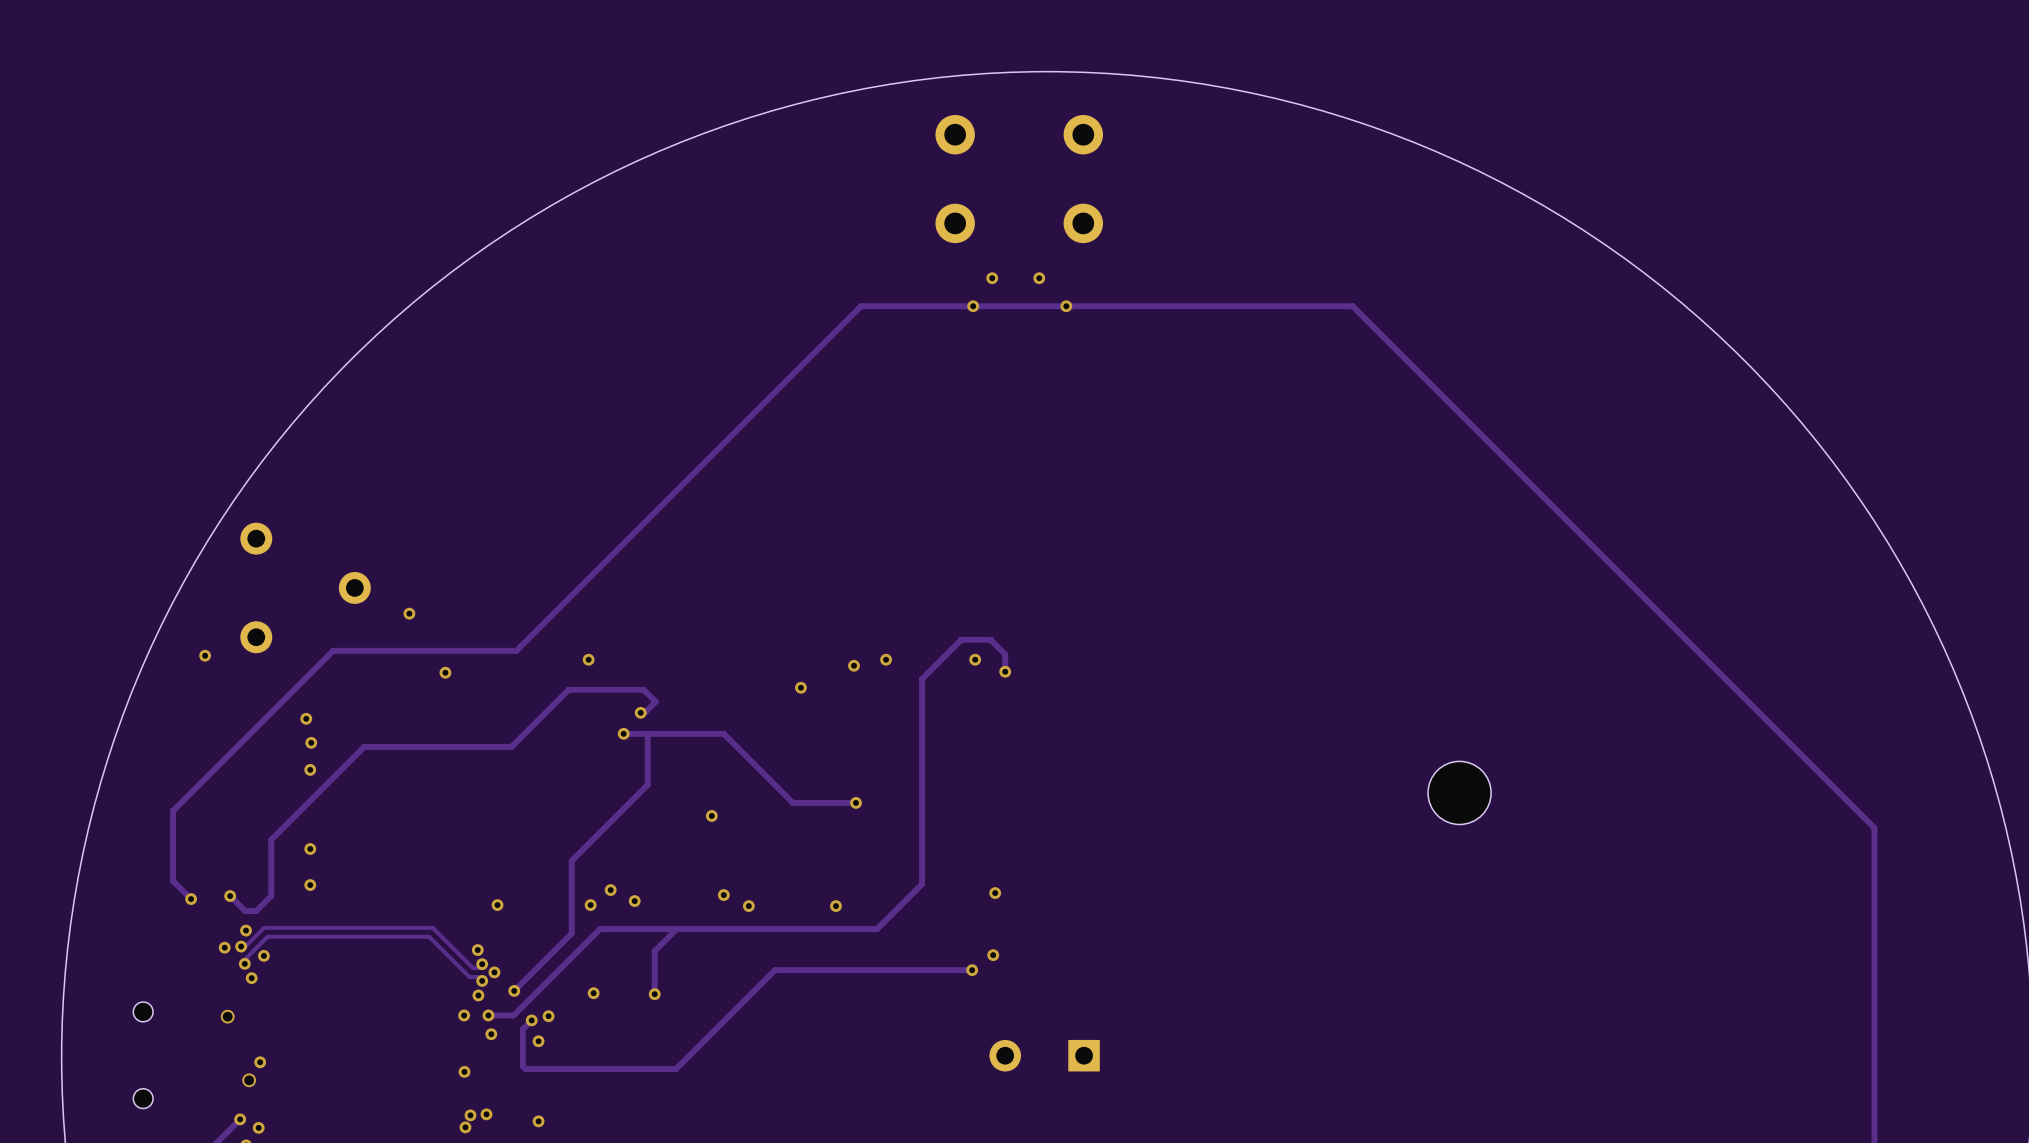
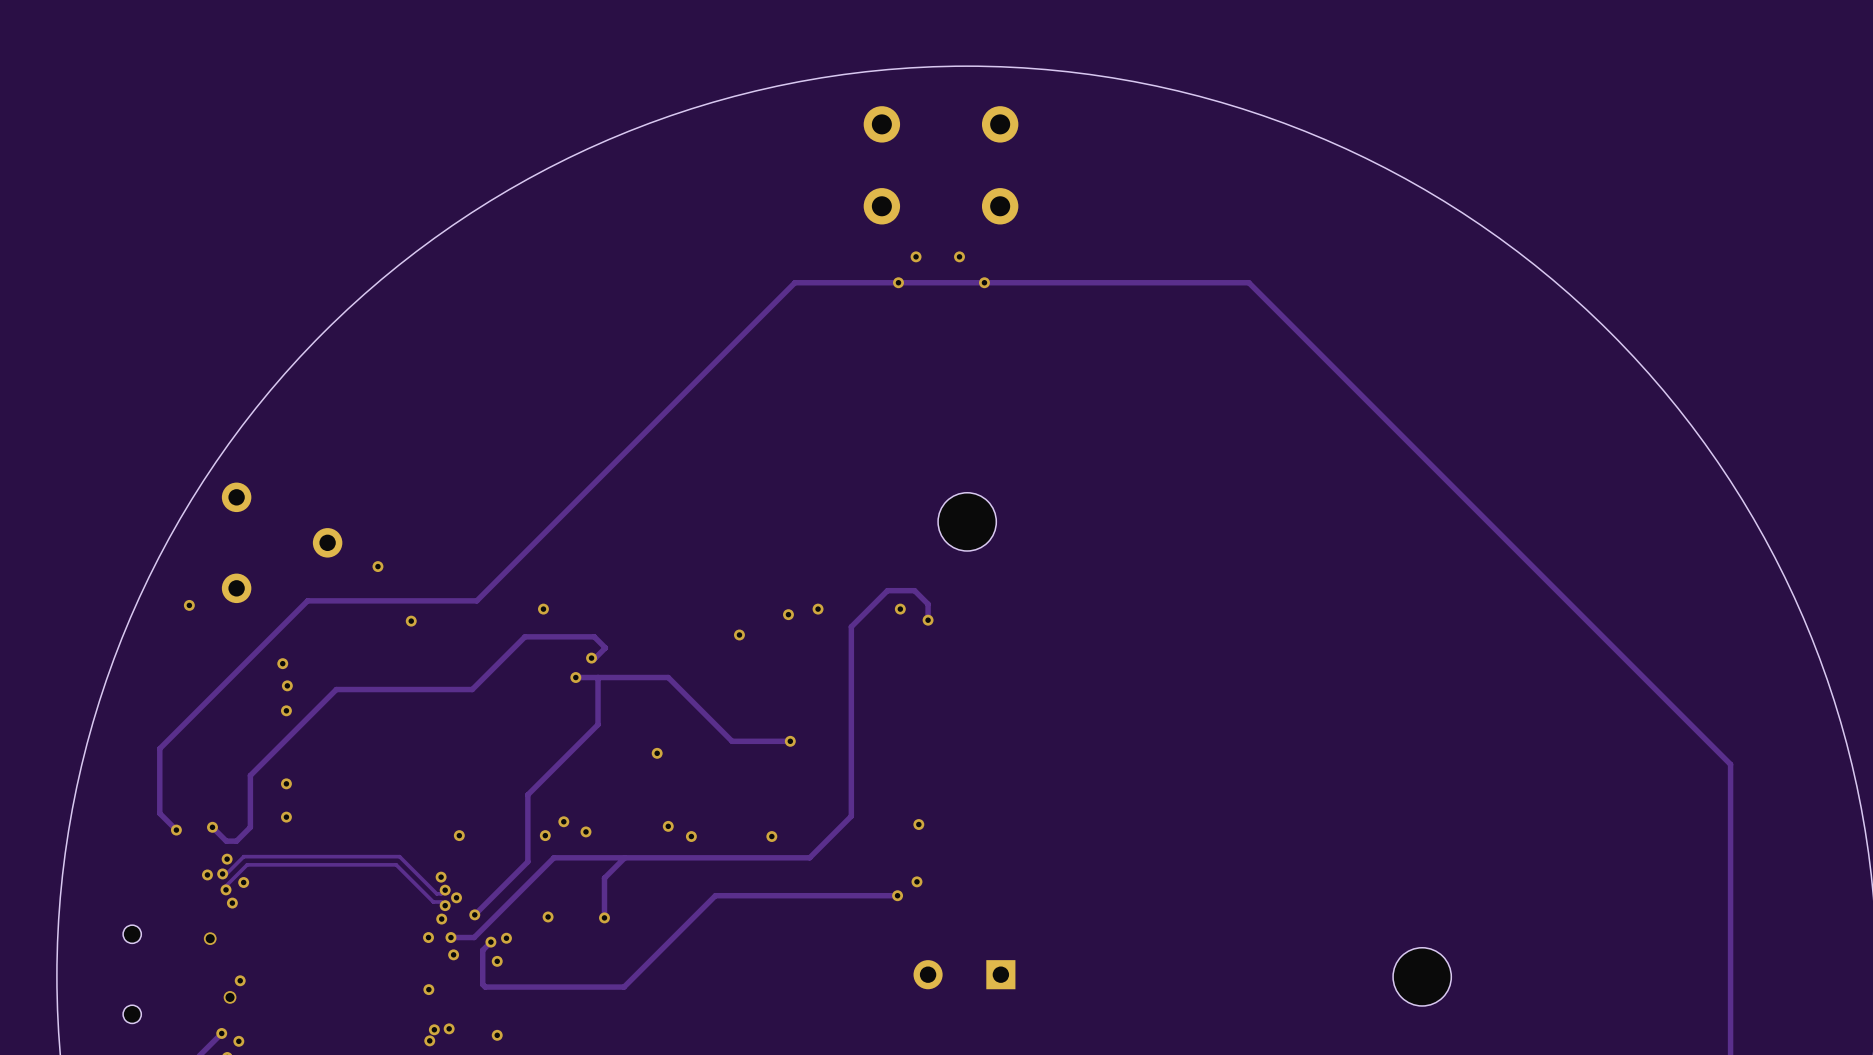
part: none -> (967, 521)
part: (1459, 792) -> none
part: none -> (1422, 976)

